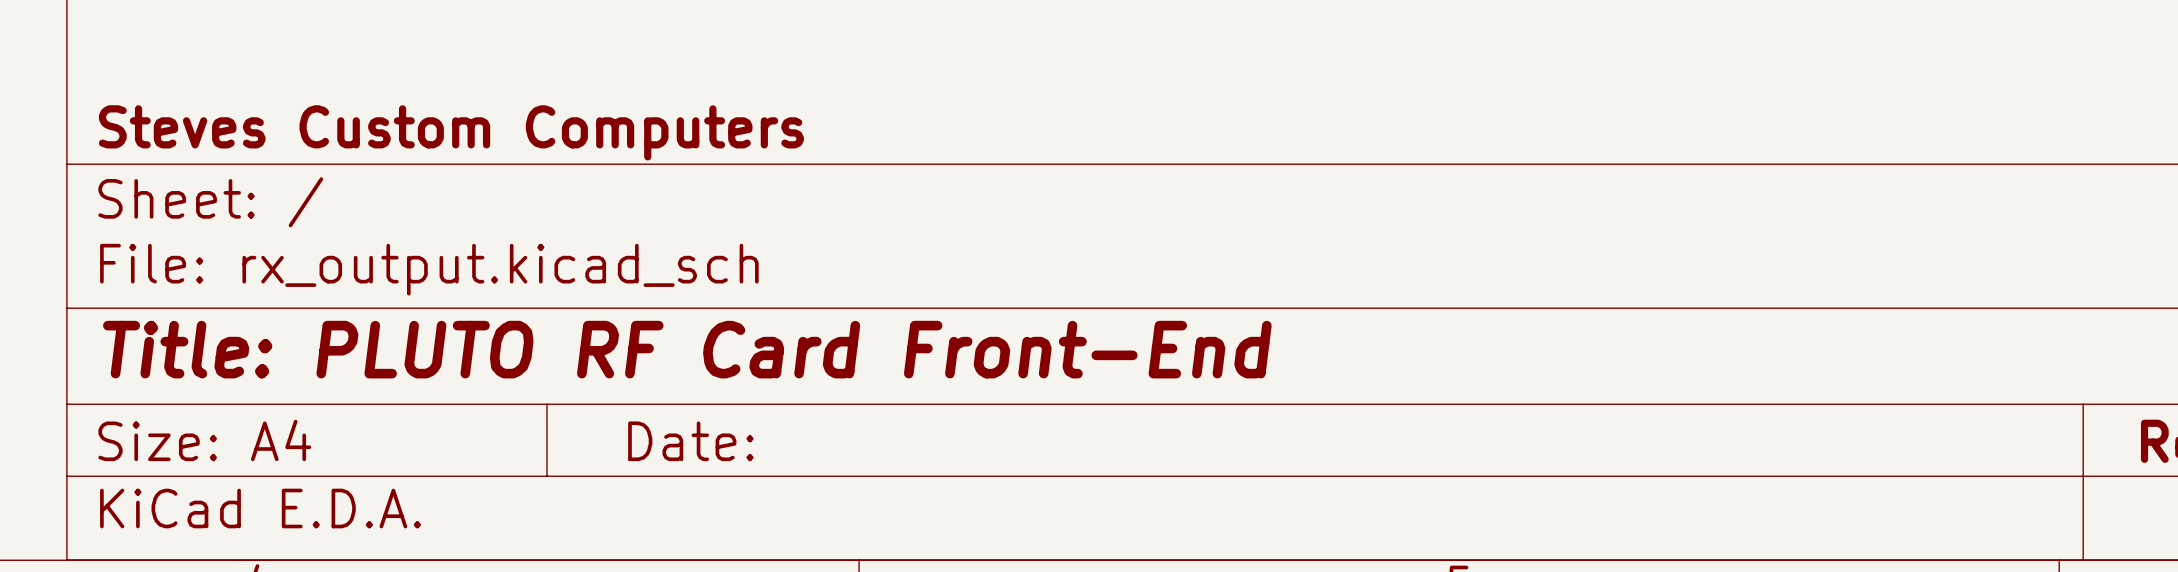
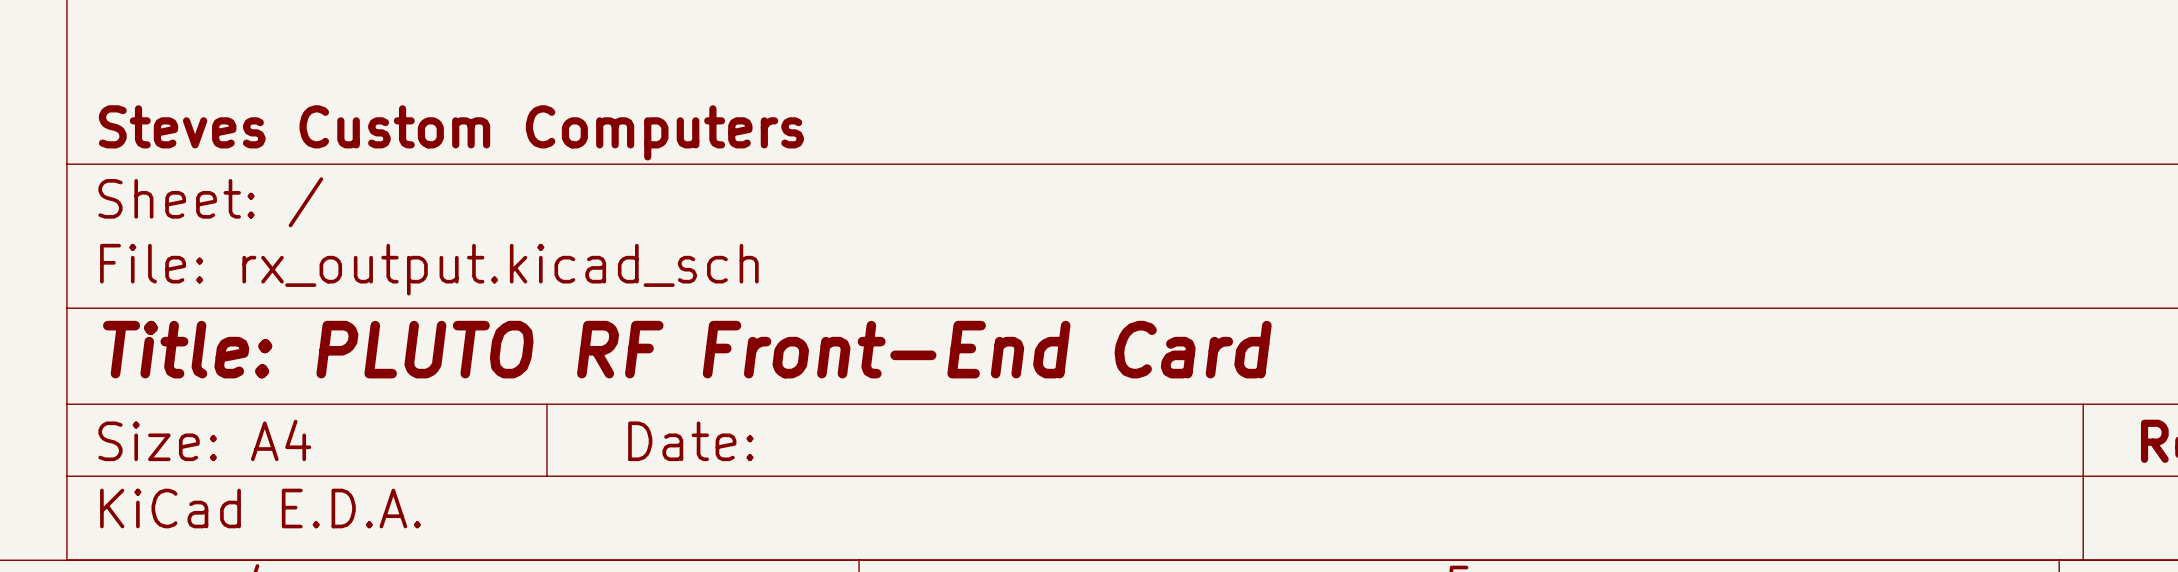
title block: Title: PLUTO RF Card Front-End (687, 349) -> Title: PLUTO RF Front-End Card (687, 349)

